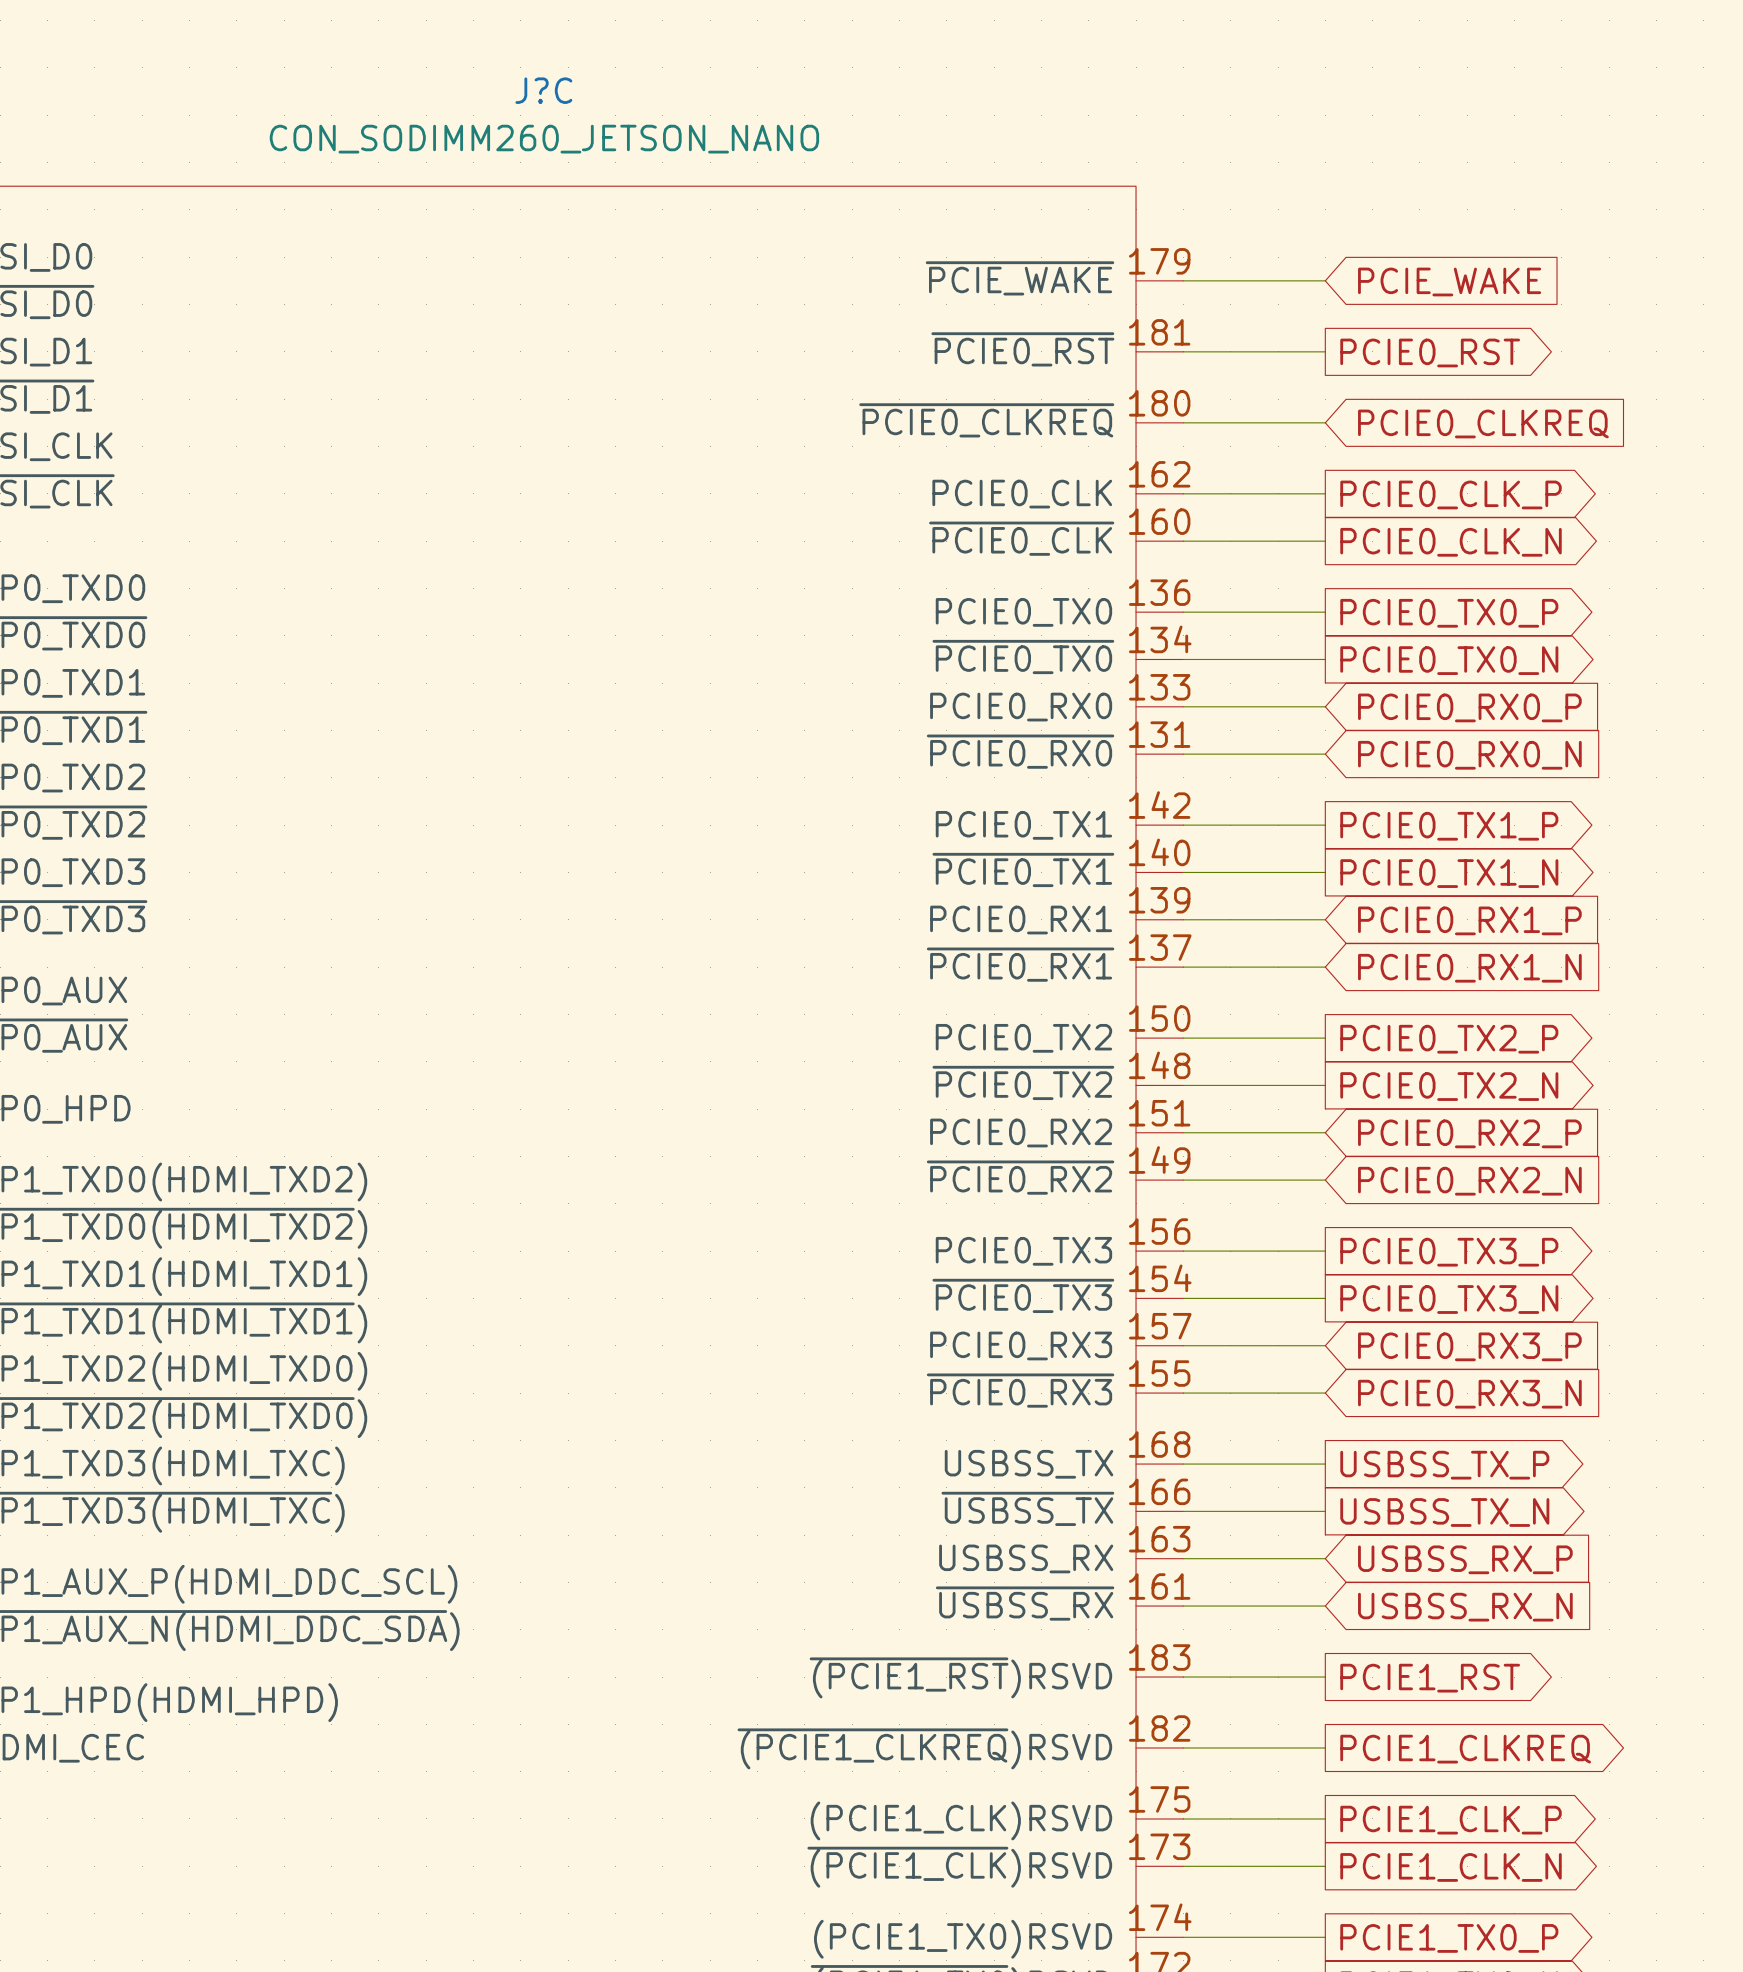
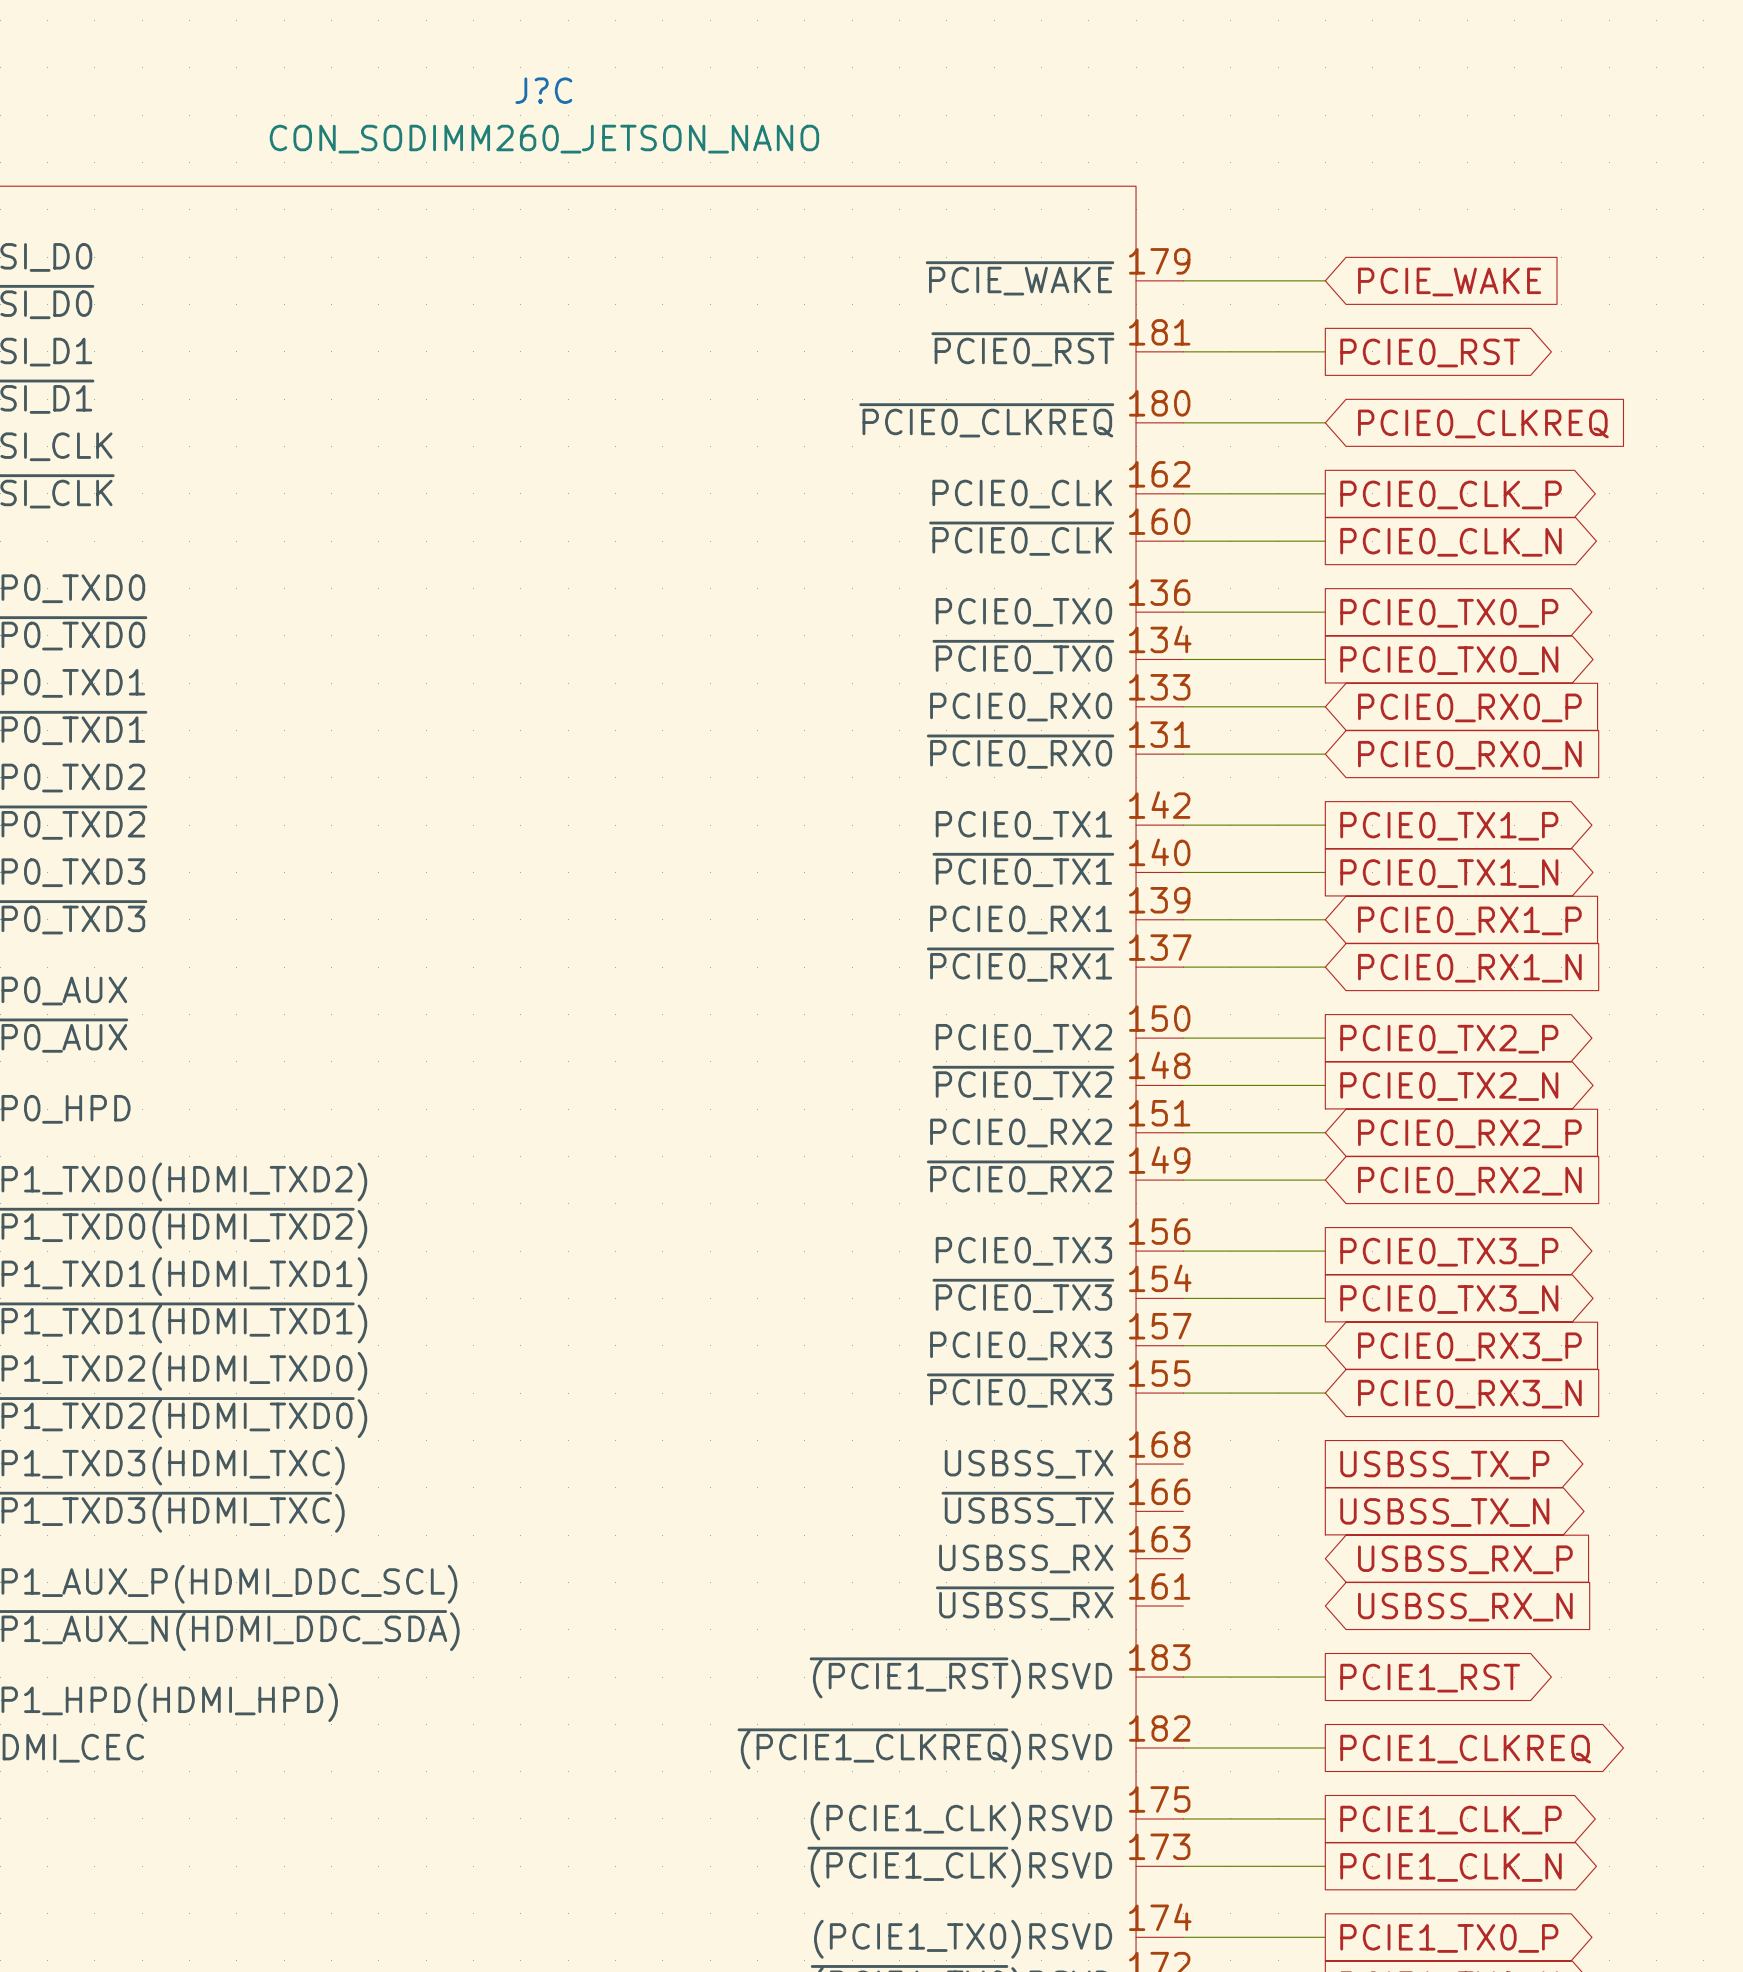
wire: (1183, 1464) (1325, 1464) -> none
wire: (1183, 1511) (1325, 1511) -> none
wire: (1183, 1558) (1325, 1558) -> none
wire: (1183, 1606) (1325, 1606) -> none

